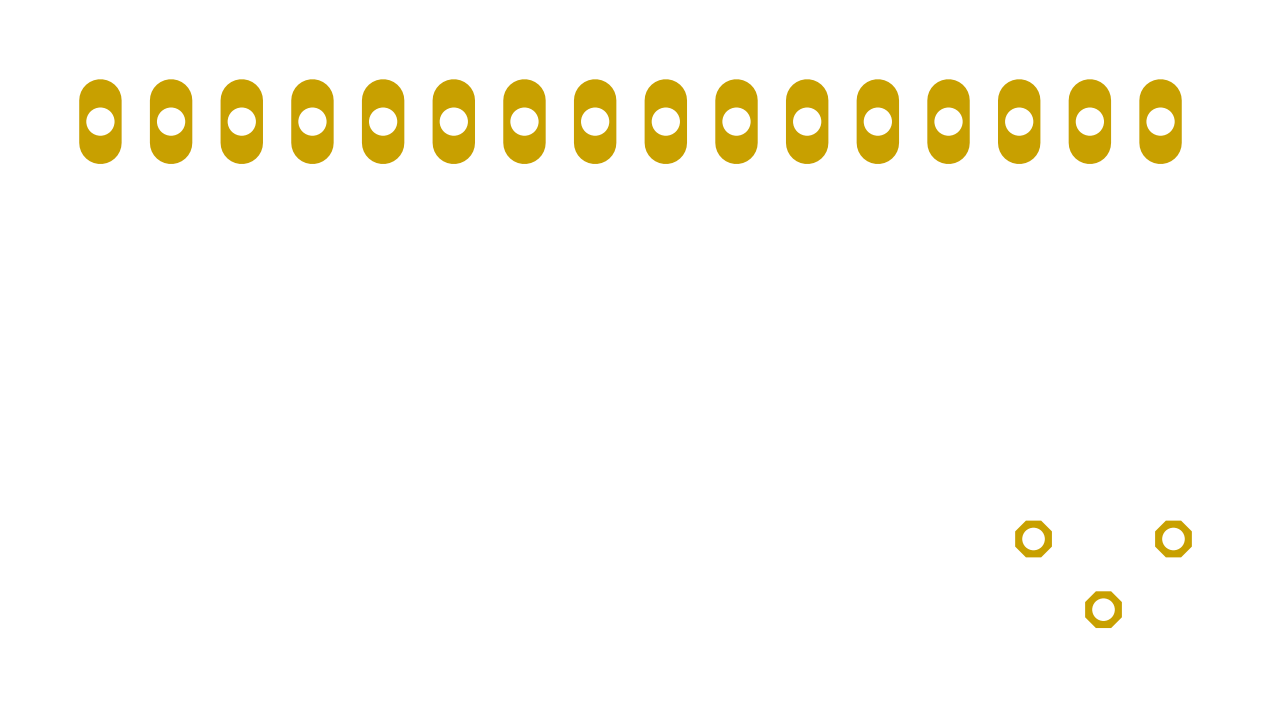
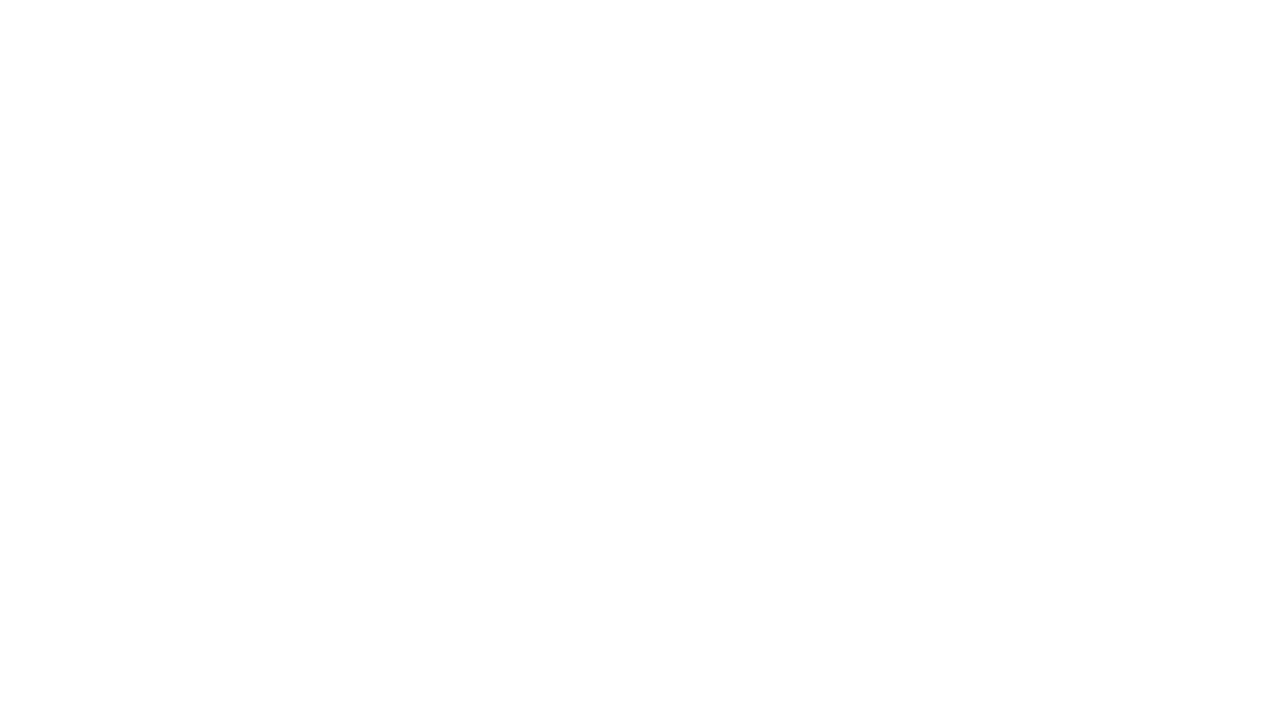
part: (630, 121) -> none
part: (1103, 574) -> none

